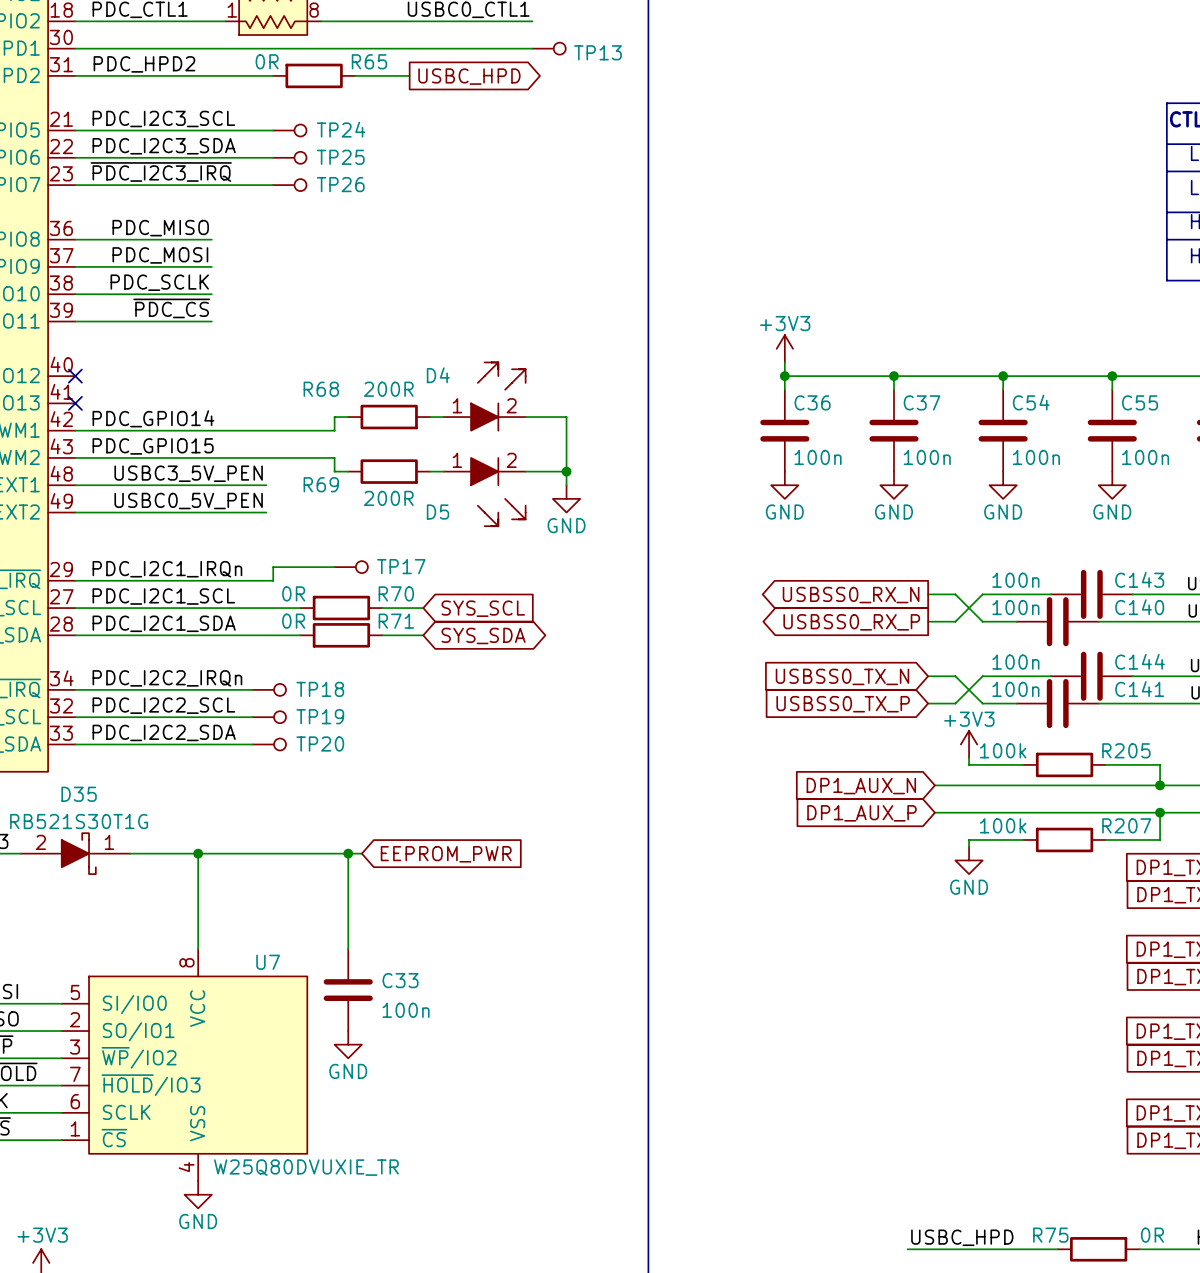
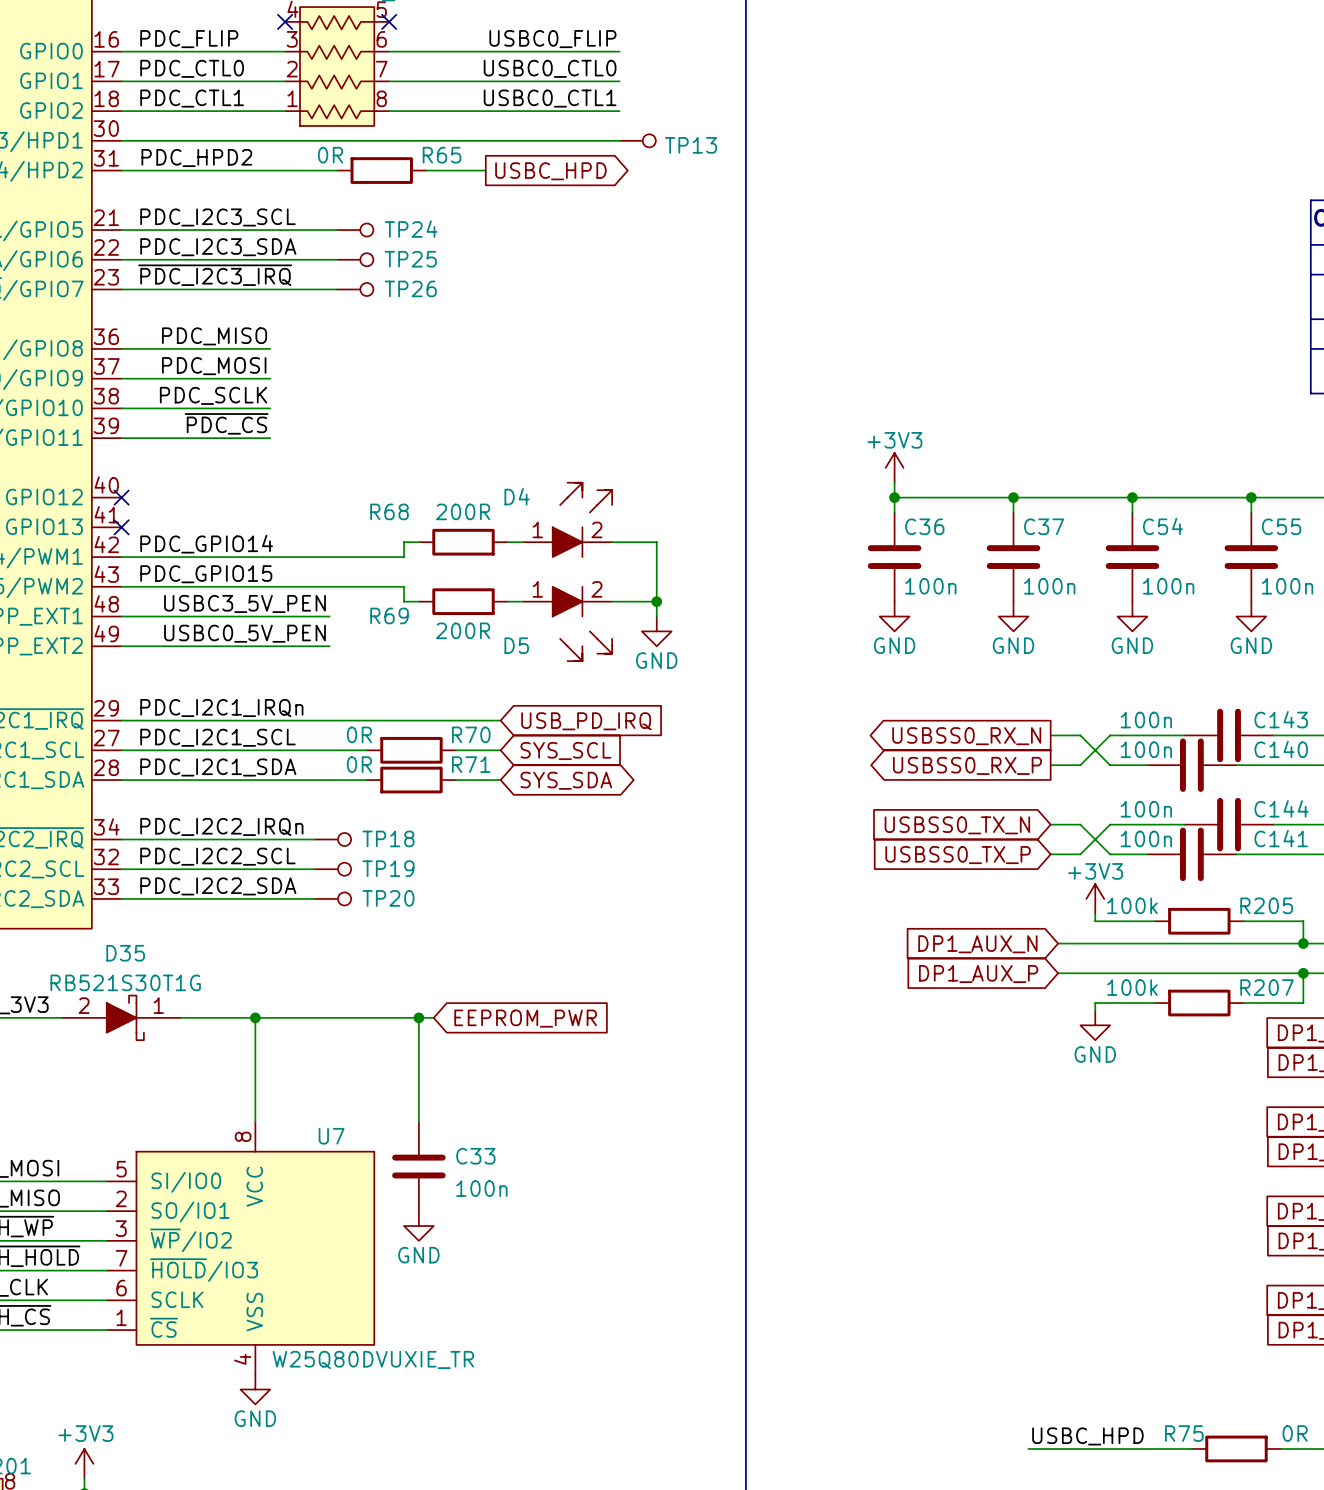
wire: (334, 567) (273, 567) (273, 580) -> (500, 720) (337, 720)
TP17: (351, 567) -> none
global label: none -> USB_PD_IRQ (586, 721)

